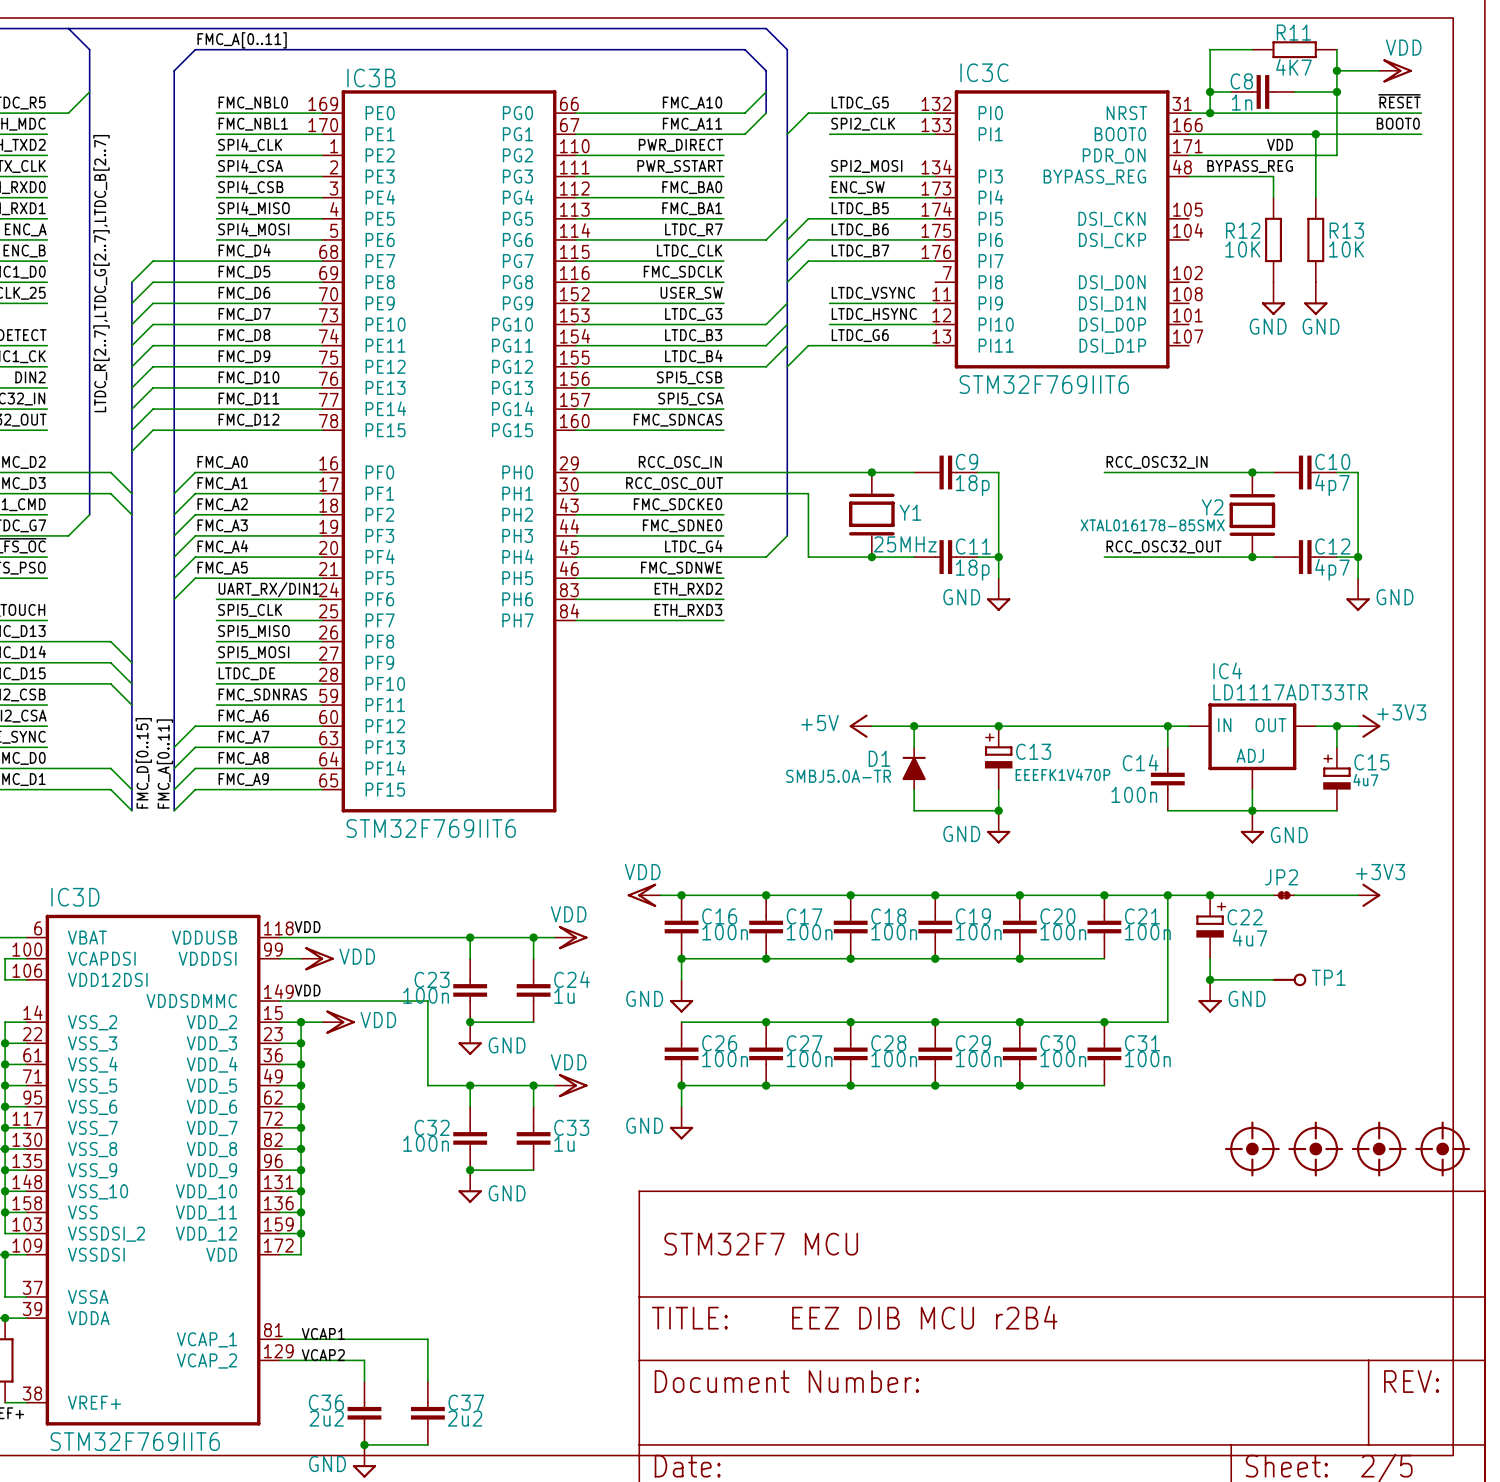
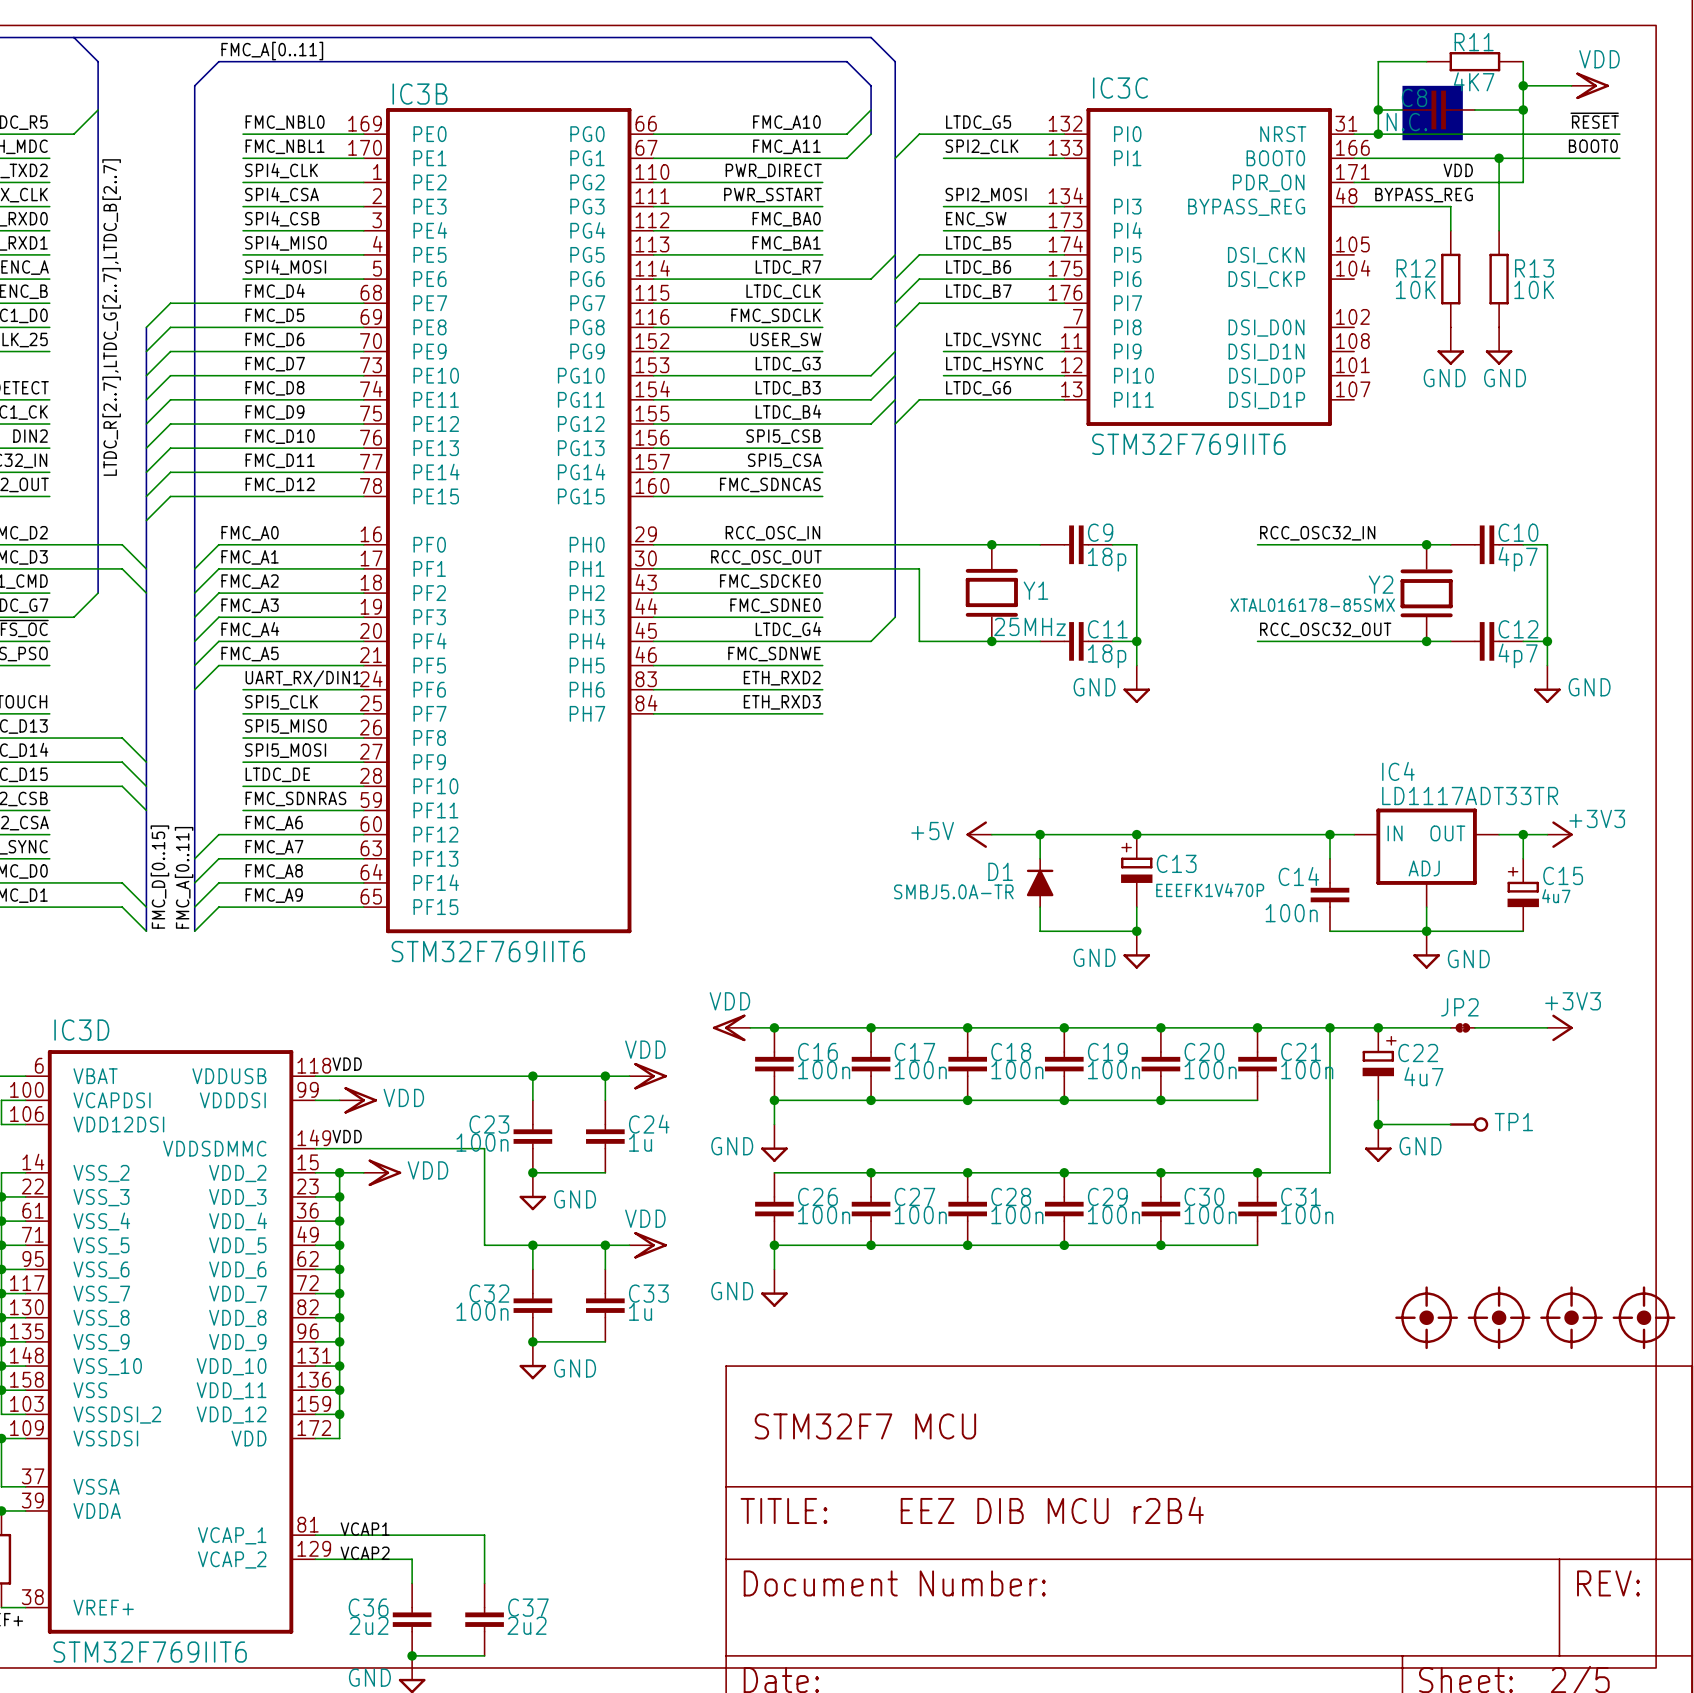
drawing: none -> [1402, 85, 1463, 141]
C8 value: 1n (1242, 102) -> N.C. (1406, 122)

